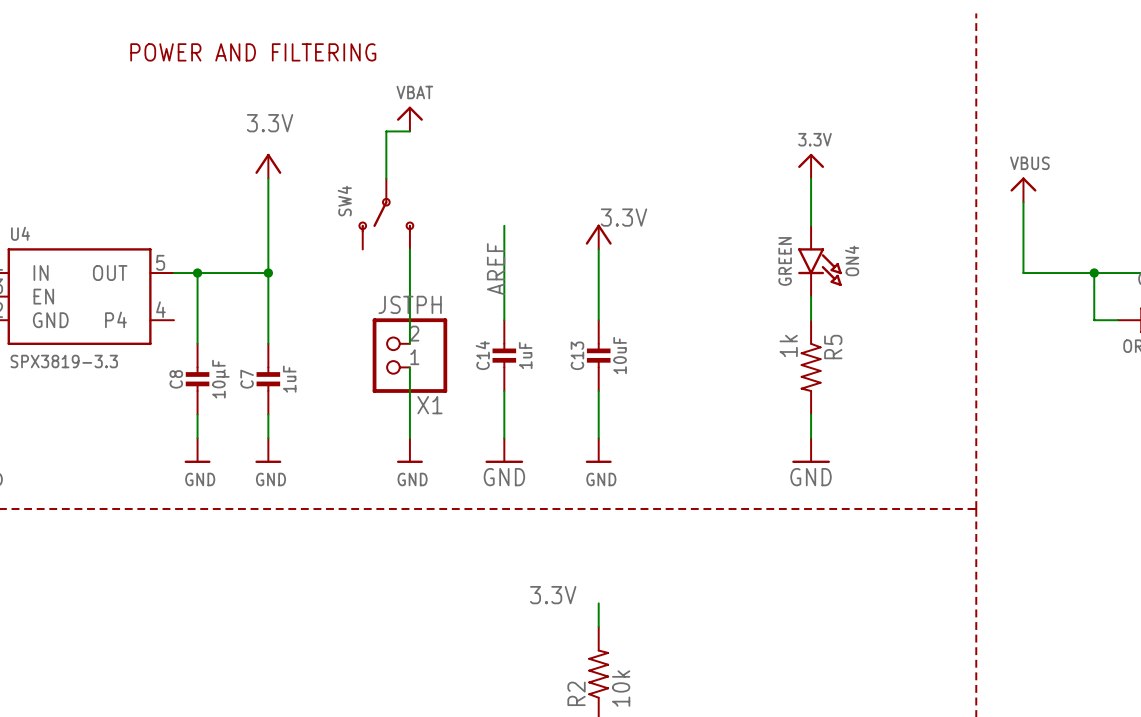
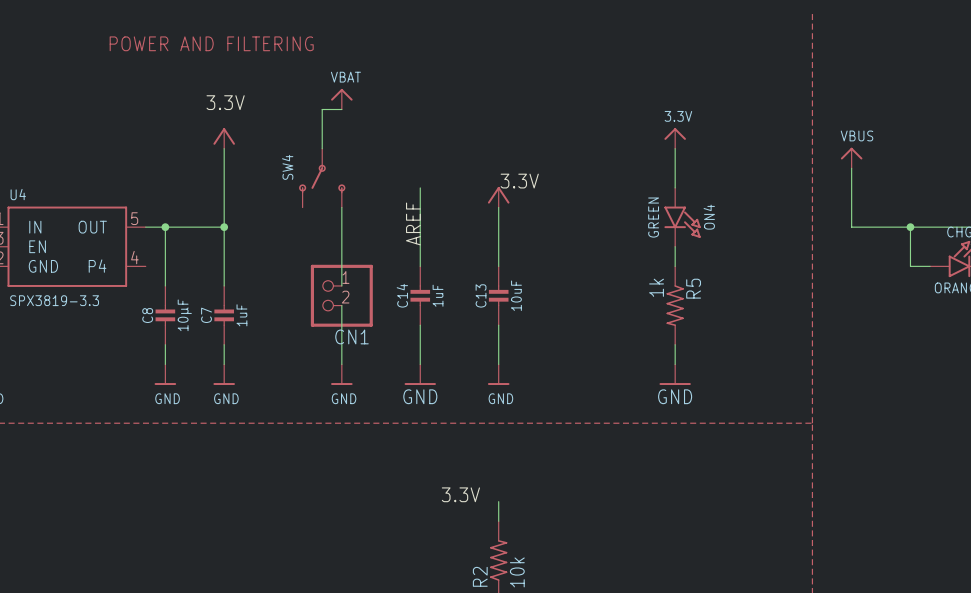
X1 value: JSTPH (410, 304) -> none
X1 flip: as is (409, 355) -> up-down (341, 295)
X1 name: X1 (429, 405) -> CN1 (351, 336)

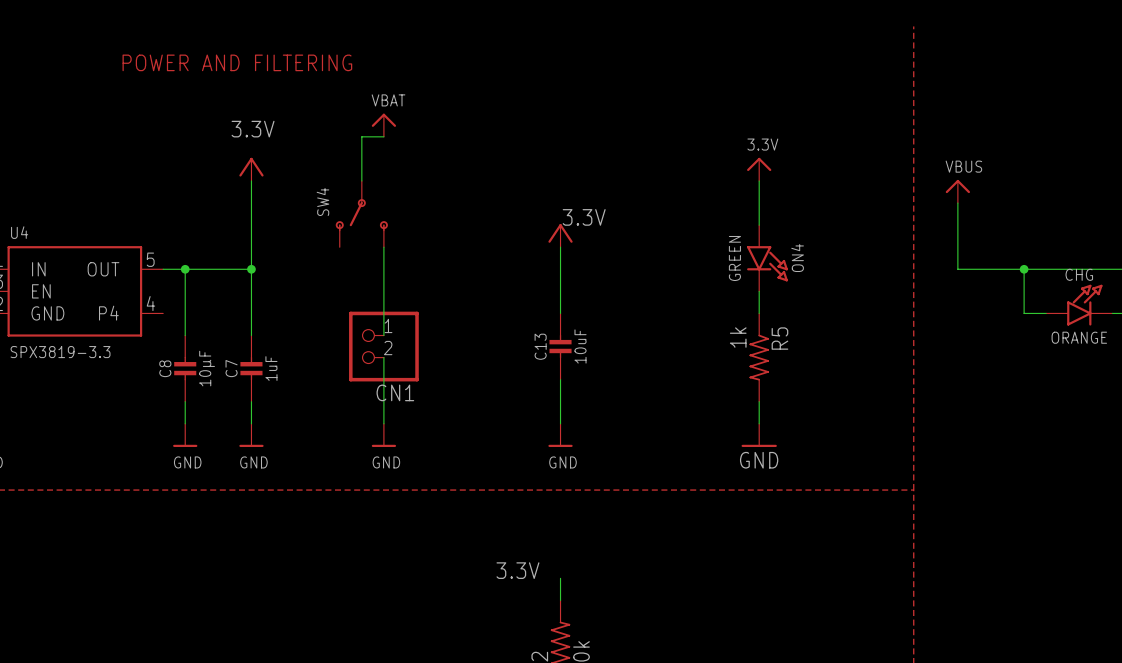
wire: (420, 187) (420, 266) -> none
label: AREF (413, 223) -> none
C14: 1uF (420, 295) -> none
wire: (420, 325) (420, 364) -> none
power symbol: GND (420, 374) -> none

